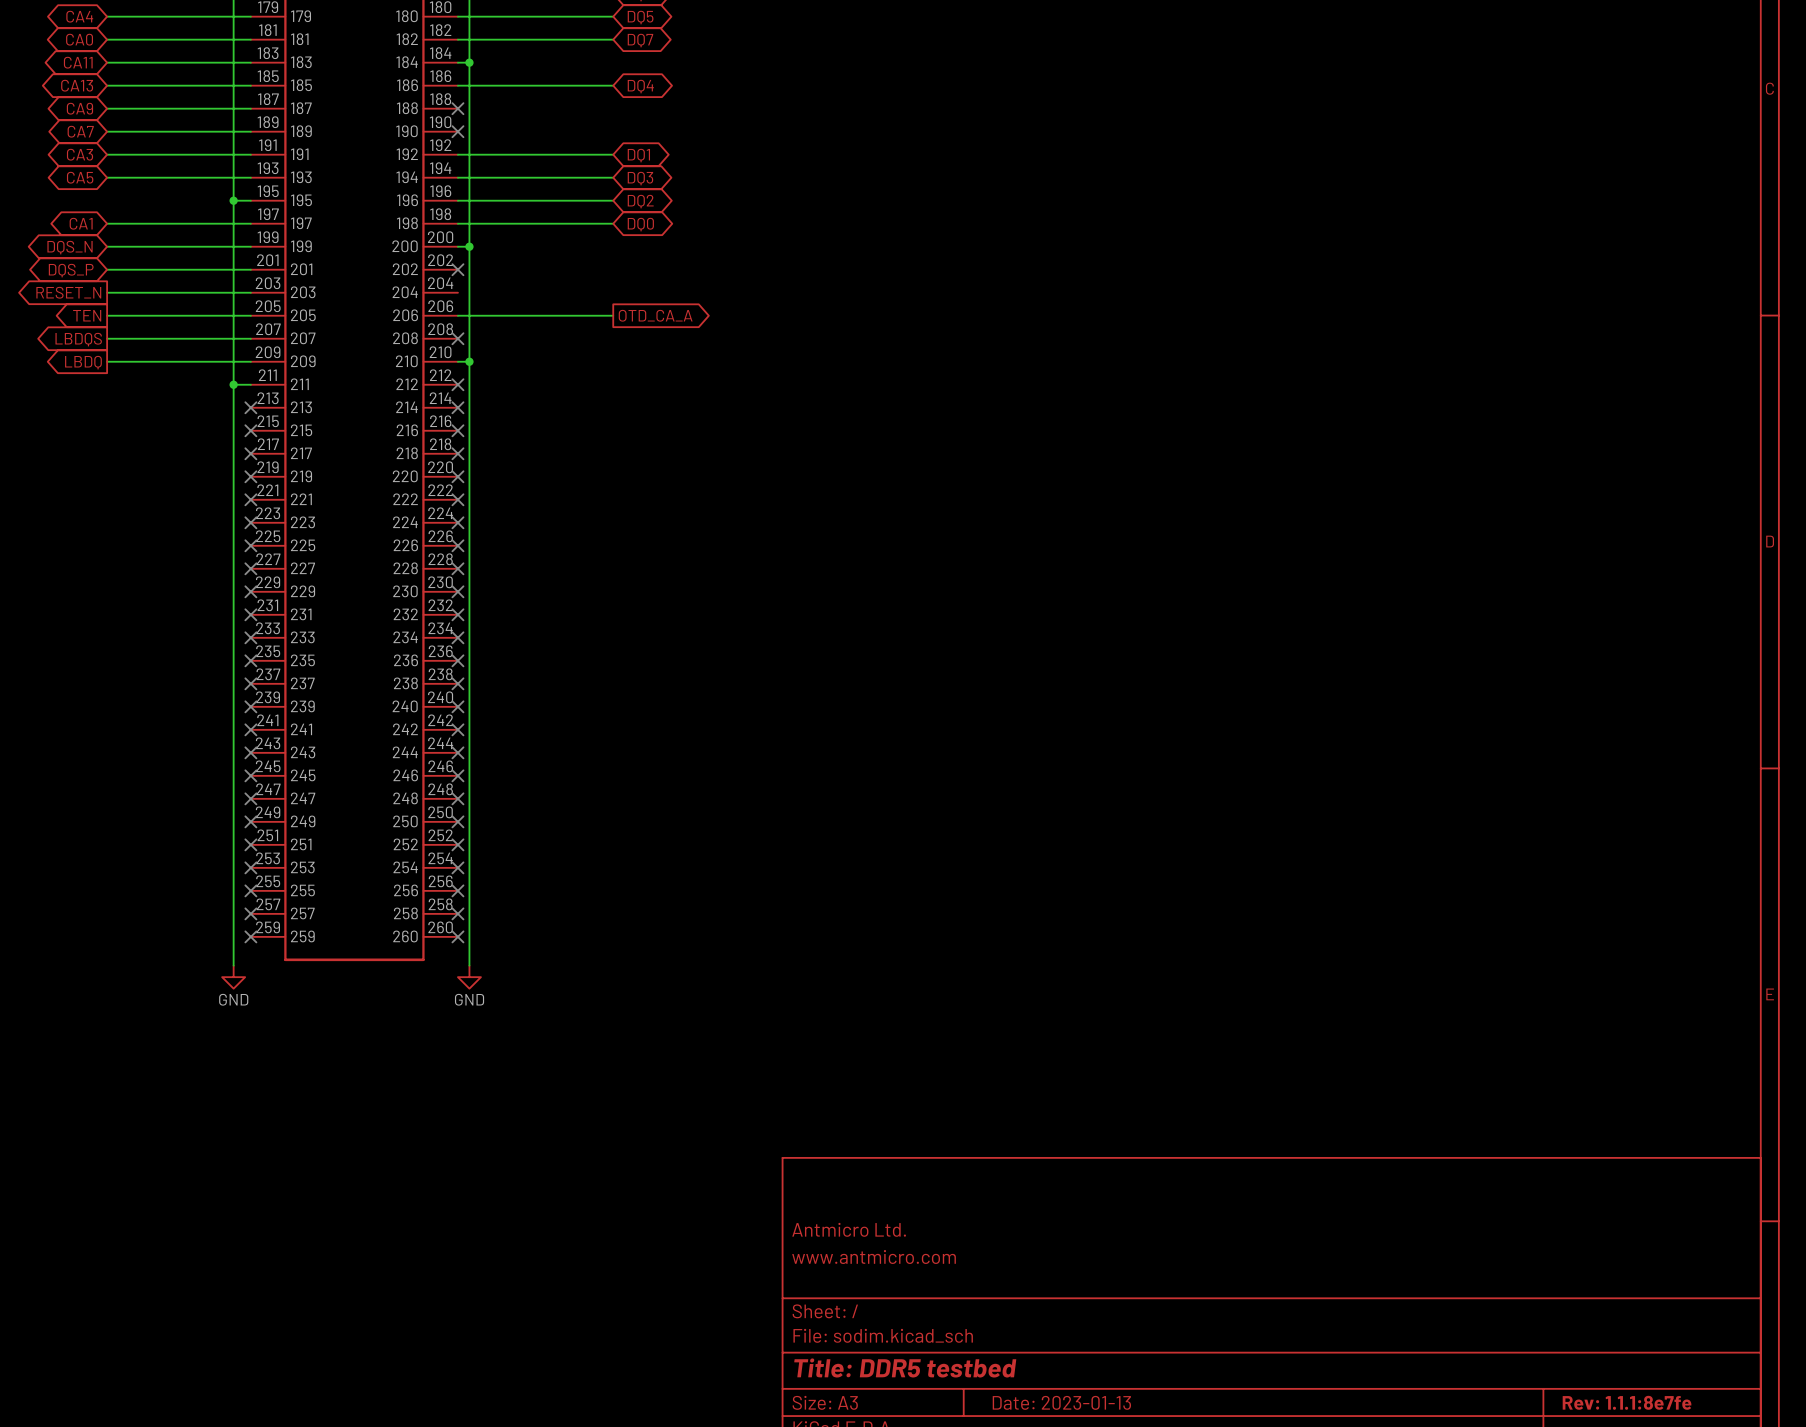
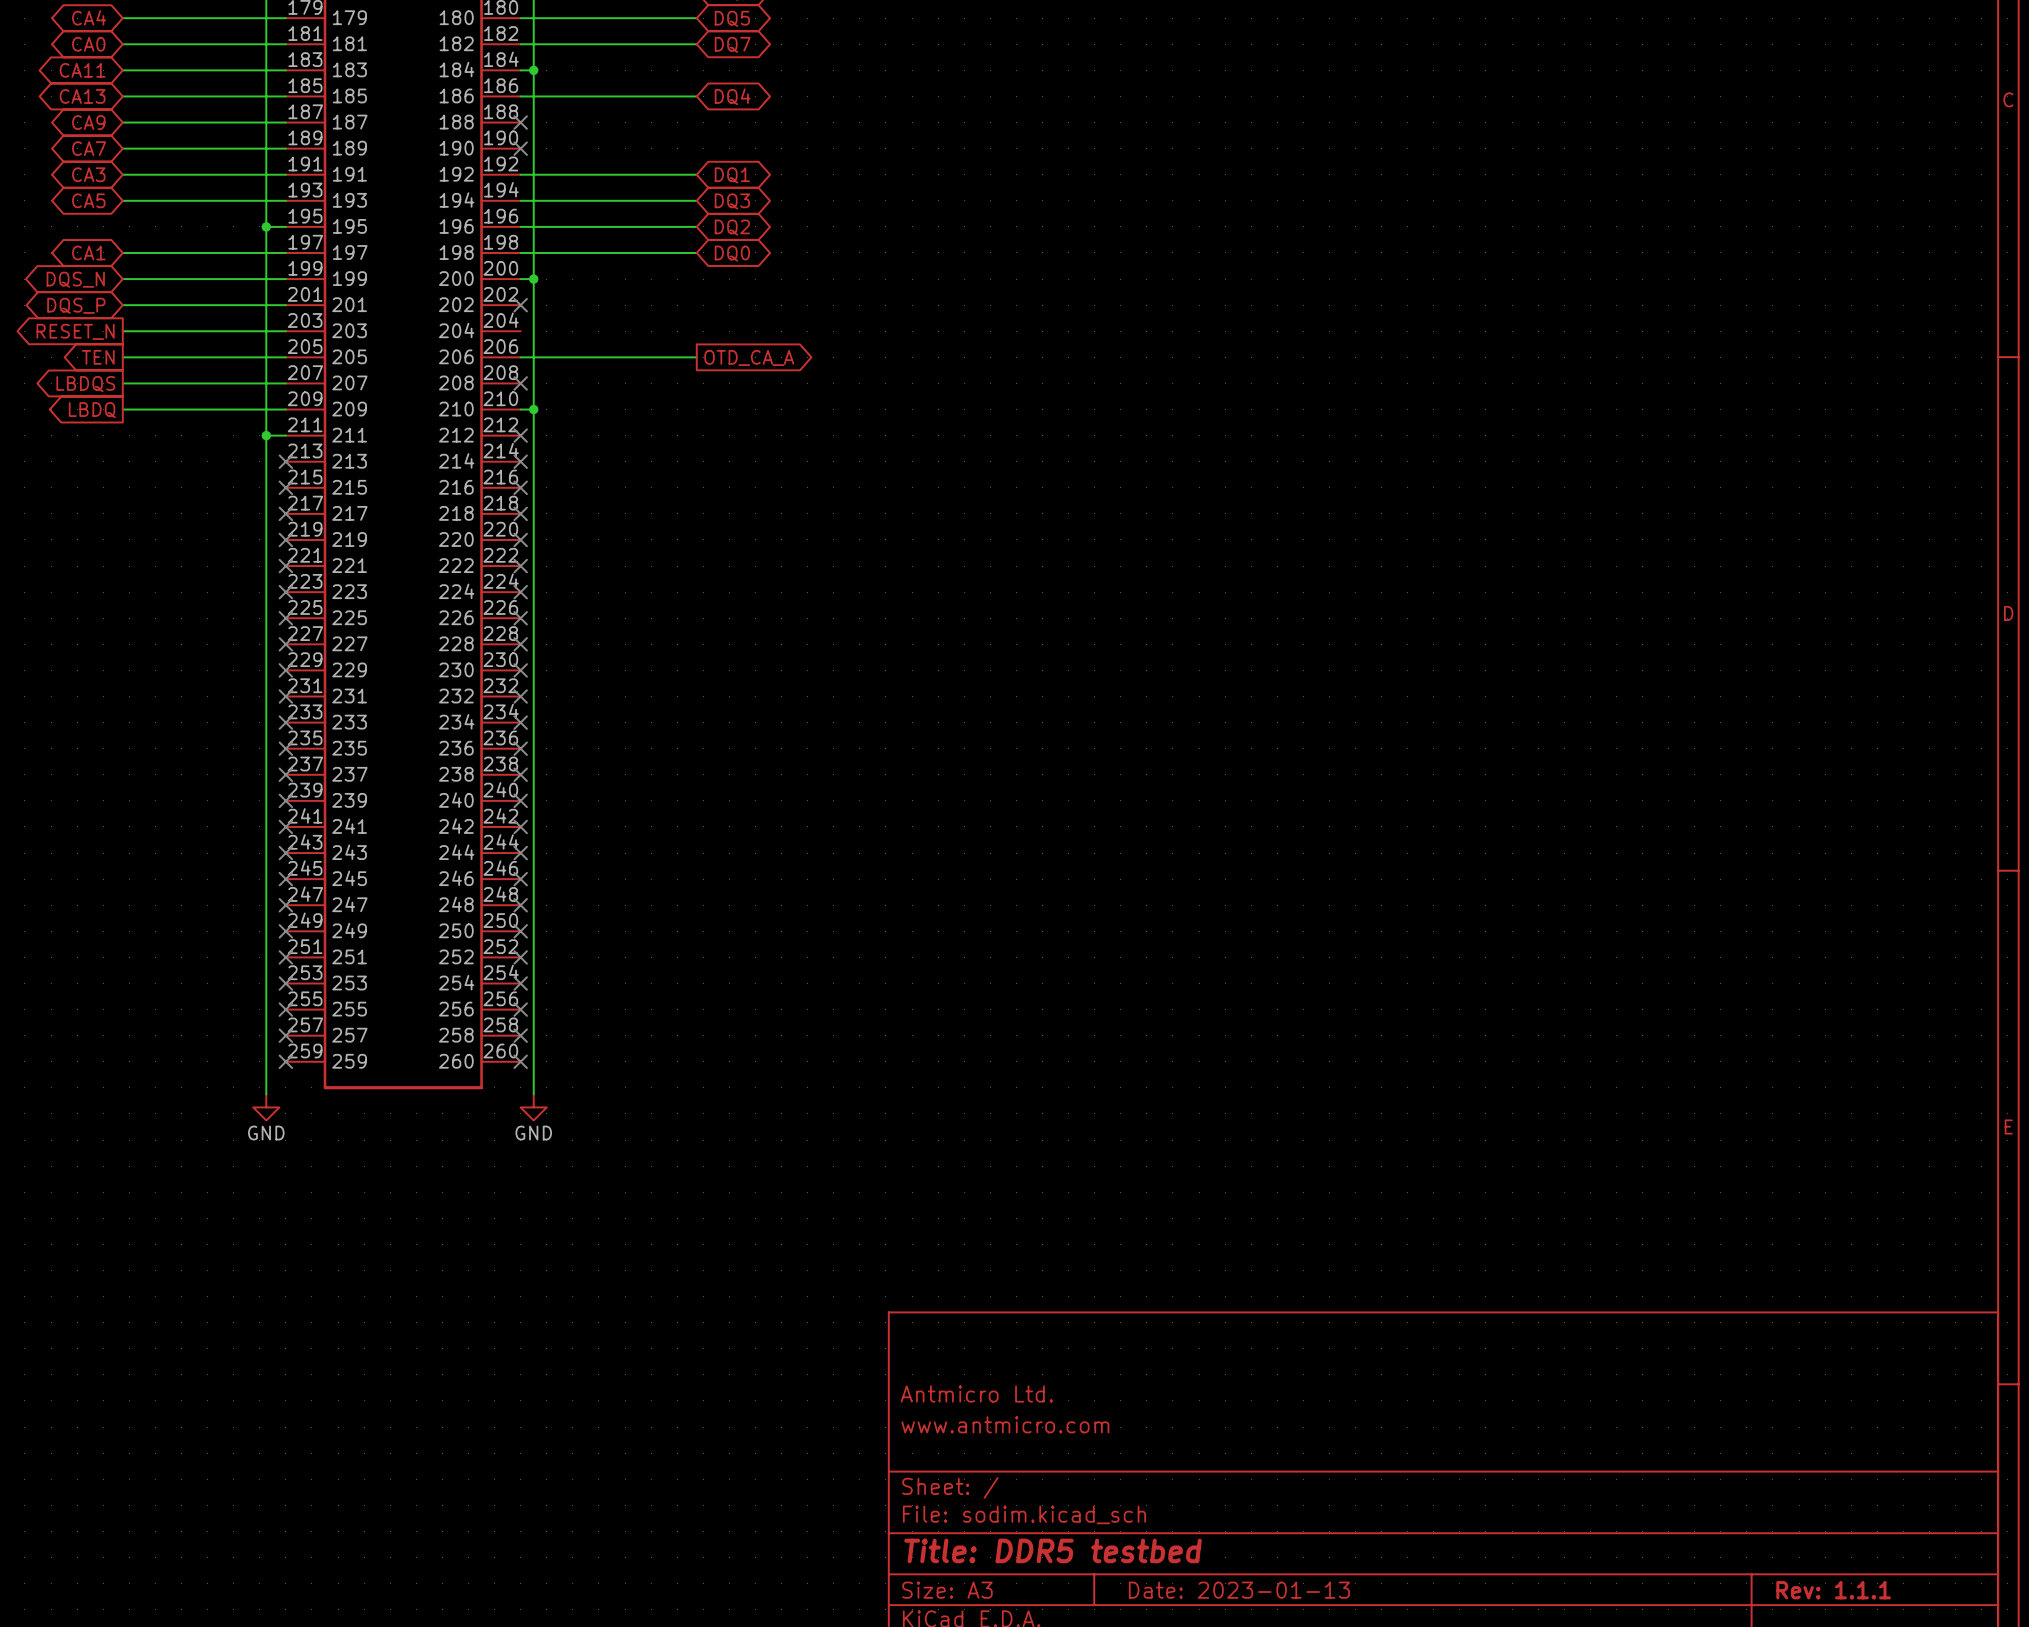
title block: Rev: 1.1.1:8e7fe (1627, 1402) -> Rev: 1.1.1 (1833, 1590)

